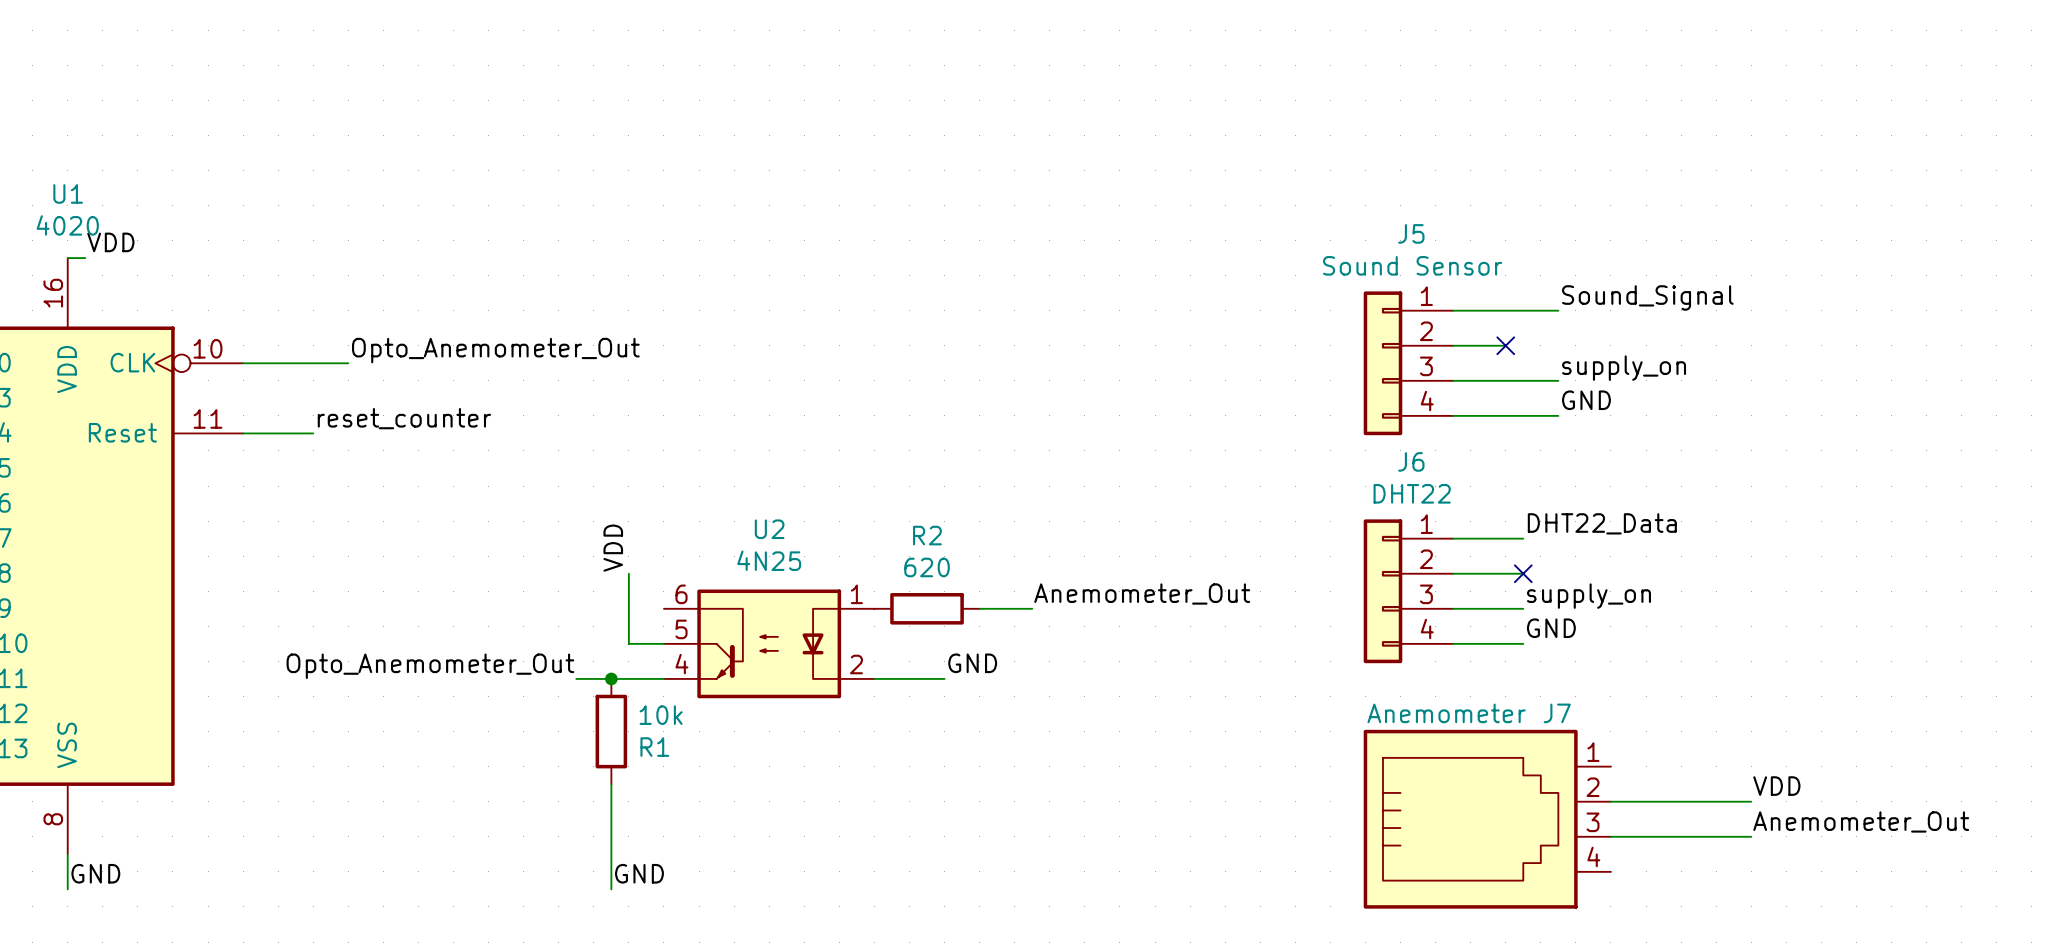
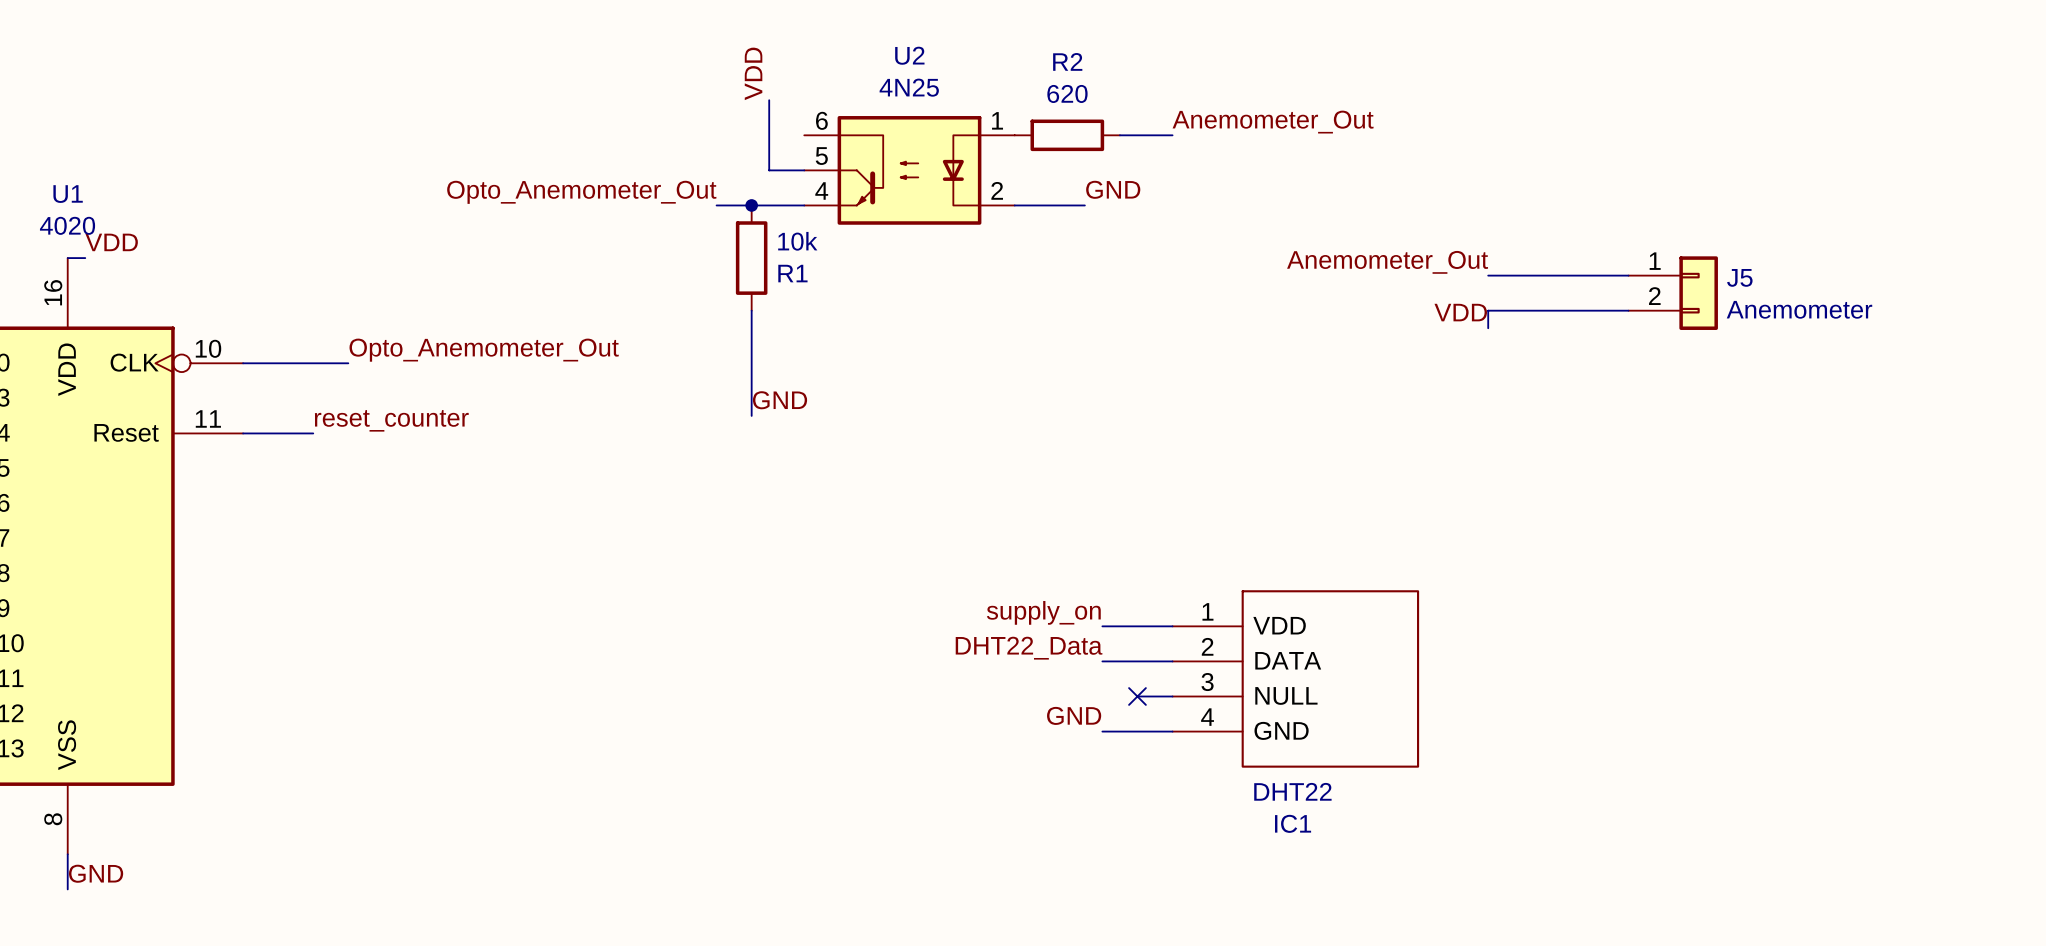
label: none -> VDD (753, 73)
wire: none -> (769, 100) (769, 170) (804, 170)
label: none -> Anemometer_Out (1273, 122)
wire: none -> (1119, 135) (1172, 135)
label: none -> GND (1113, 189)
label: none -> Opto_Anemometer_Out (581, 192)
wire: none -> (716, 205) (804, 205)
junction: none -> (751, 205)
wire: none -> (1014, 205) (1084, 205)
J5 name position: J5 (1411, 233) -> J5 (1739, 277)
label: none -> Anemometer_Out (1387, 262)
J5 value: Sound Sensor (1412, 265) -> Anemometer (1799, 309)
wire: none -> (1488, 275) (1628, 275)
J5 symbol: [1363, 291, 1454, 436] -> [1628, 256, 1718, 330]
label: Sound_Signal (1647, 297) -> none
wire: none -> (751, 310) (751, 415)
wire: (1453, 310) (1488, 310) -> (1488, 328) (1488, 310)
label: none -> VDD (1460, 312)
wire: (1453, 345) (1505, 345) -> none
no-connect mark: (1505, 345) -> none
label: supply_on (1624, 368) -> none
wire: (1453, 380) (1558, 380) -> none
label: none -> GND (780, 400)
label: GND (1586, 400) -> none
wire: (1453, 415) (1558, 415) -> none
label: DHT22_Data (1602, 523) -> none
wire: (1453, 538) (1523, 538) -> (1558, 310) (1628, 310)
label: VDD (613, 548) -> none
wire: (628, 573) (628, 643) (663, 643) -> none
wire: (1453, 573) (1523, 573) -> none
no-connect mark: (1523, 573) -> none
J6: DHT22 (1408, 591) -> none
label: Anemometer_Out (1142, 593) -> none
label: supply_on (1588, 596) -> none
R2 position: (927, 608) -> (1067, 135)
wire: (979, 608) (1032, 608) -> none
wire: (1453, 608) (1523, 608) -> none
label: none -> supply_on (1043, 612)
wire: none -> (1102, 626) (1172, 626)
label: GND (1551, 628) -> none
U2 position: (769, 643) -> (909, 170)
wire: (1453, 643) (1523, 643) -> none
label: none -> DHT22_Data (1029, 648)
label: GND (972, 663) -> none
label: Opto_Anemometer_Out (430, 666) -> none
wire: (576, 678) (663, 678) -> none
junction: (611, 678) -> none
wire: (874, 678) (944, 678) -> (1102, 661) (1172, 661)
IC1: none -> DHT22 (1295, 678)
wire: none -> (1137, 696) (1172, 696)
no-connect mark: none -> (1137, 696)
label: none -> GND (1074, 715)
R1 position: (611, 731) -> (751, 258)
wire: none -> (1102, 731) (1172, 731)
wire: (611, 784) (611, 889) -> none
label: VDD (1776, 786) -> none
wire: (1610, 801) (1751, 801) -> none
J7: Anemometer (1487, 819) -> none
label: Anemometer_Out (1861, 821) -> none
wire: (1610, 836) (1751, 836) -> none
label: GND (639, 873) -> none

